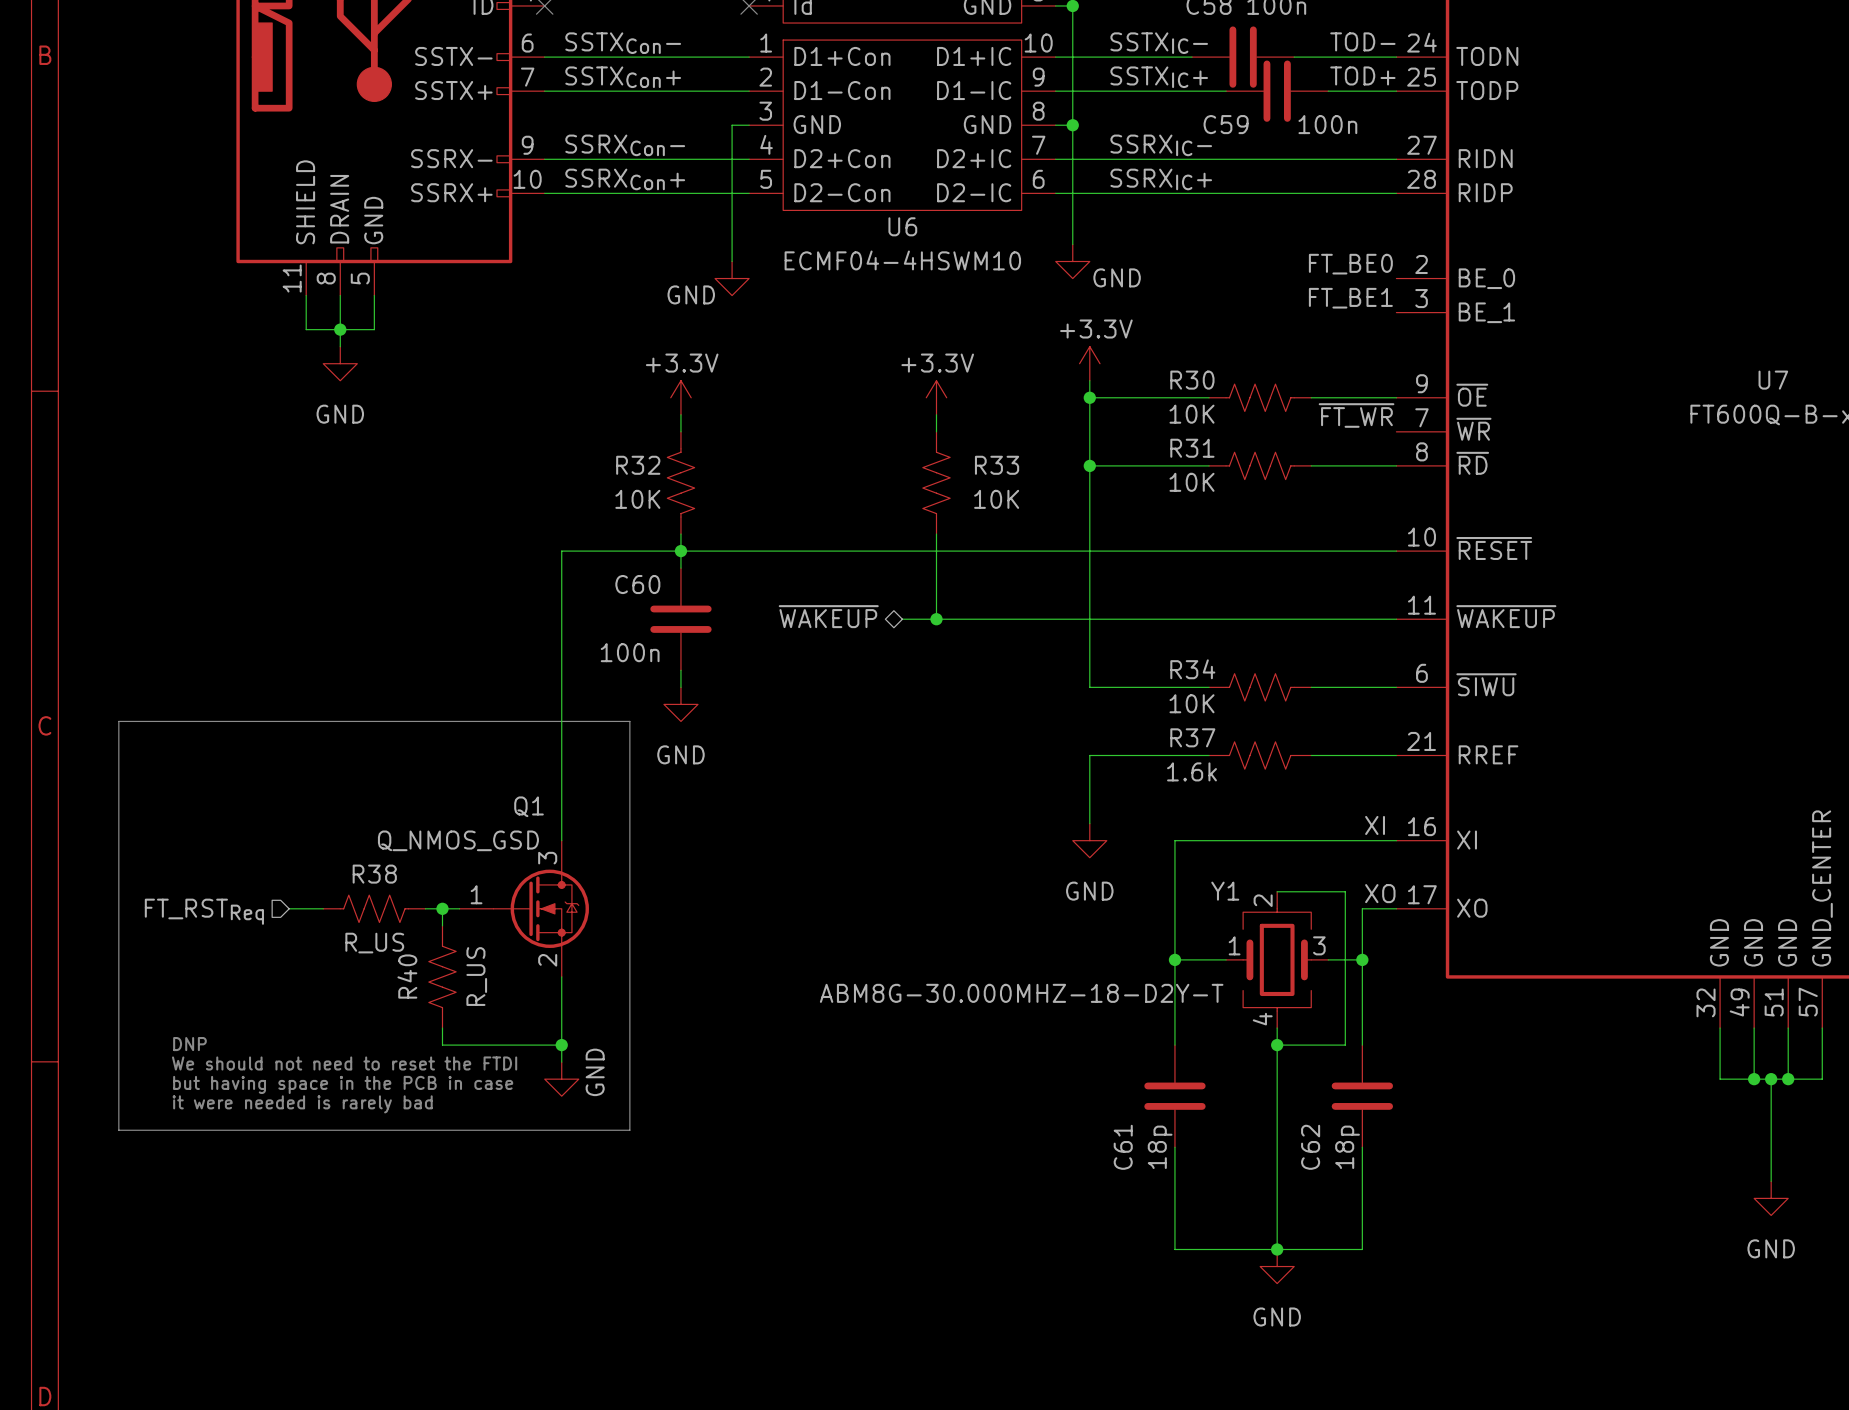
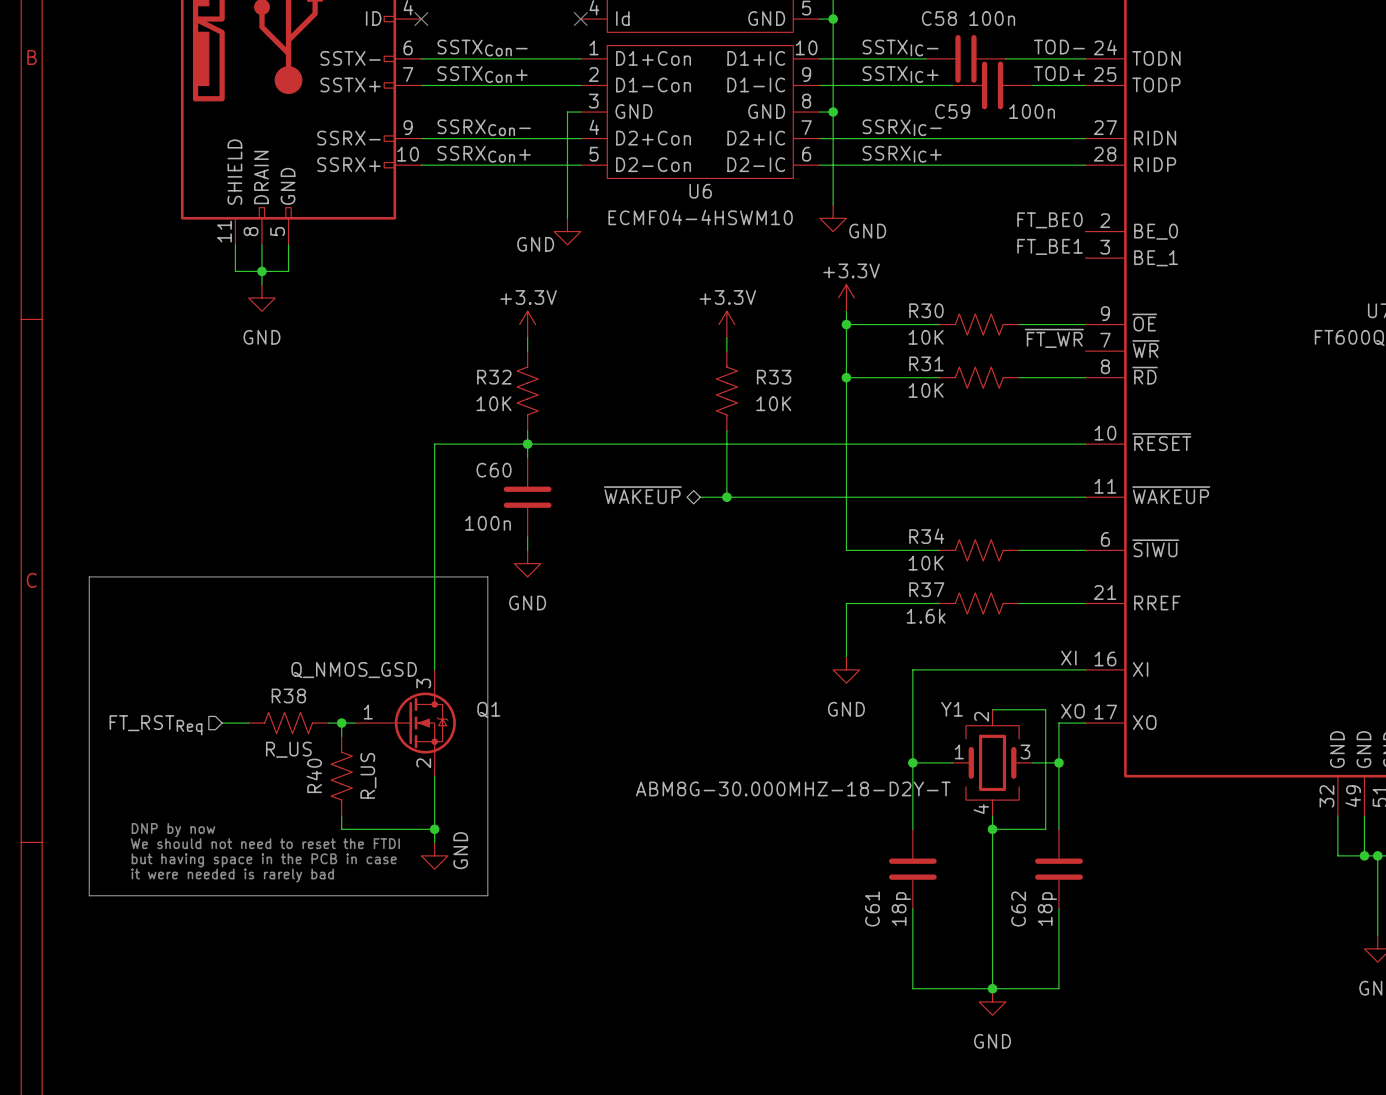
Q1 name position: Q1 (529, 806) -> Q1 (488, 709)
text: DNP (189, 1044) -> DNP by now (173, 830)

